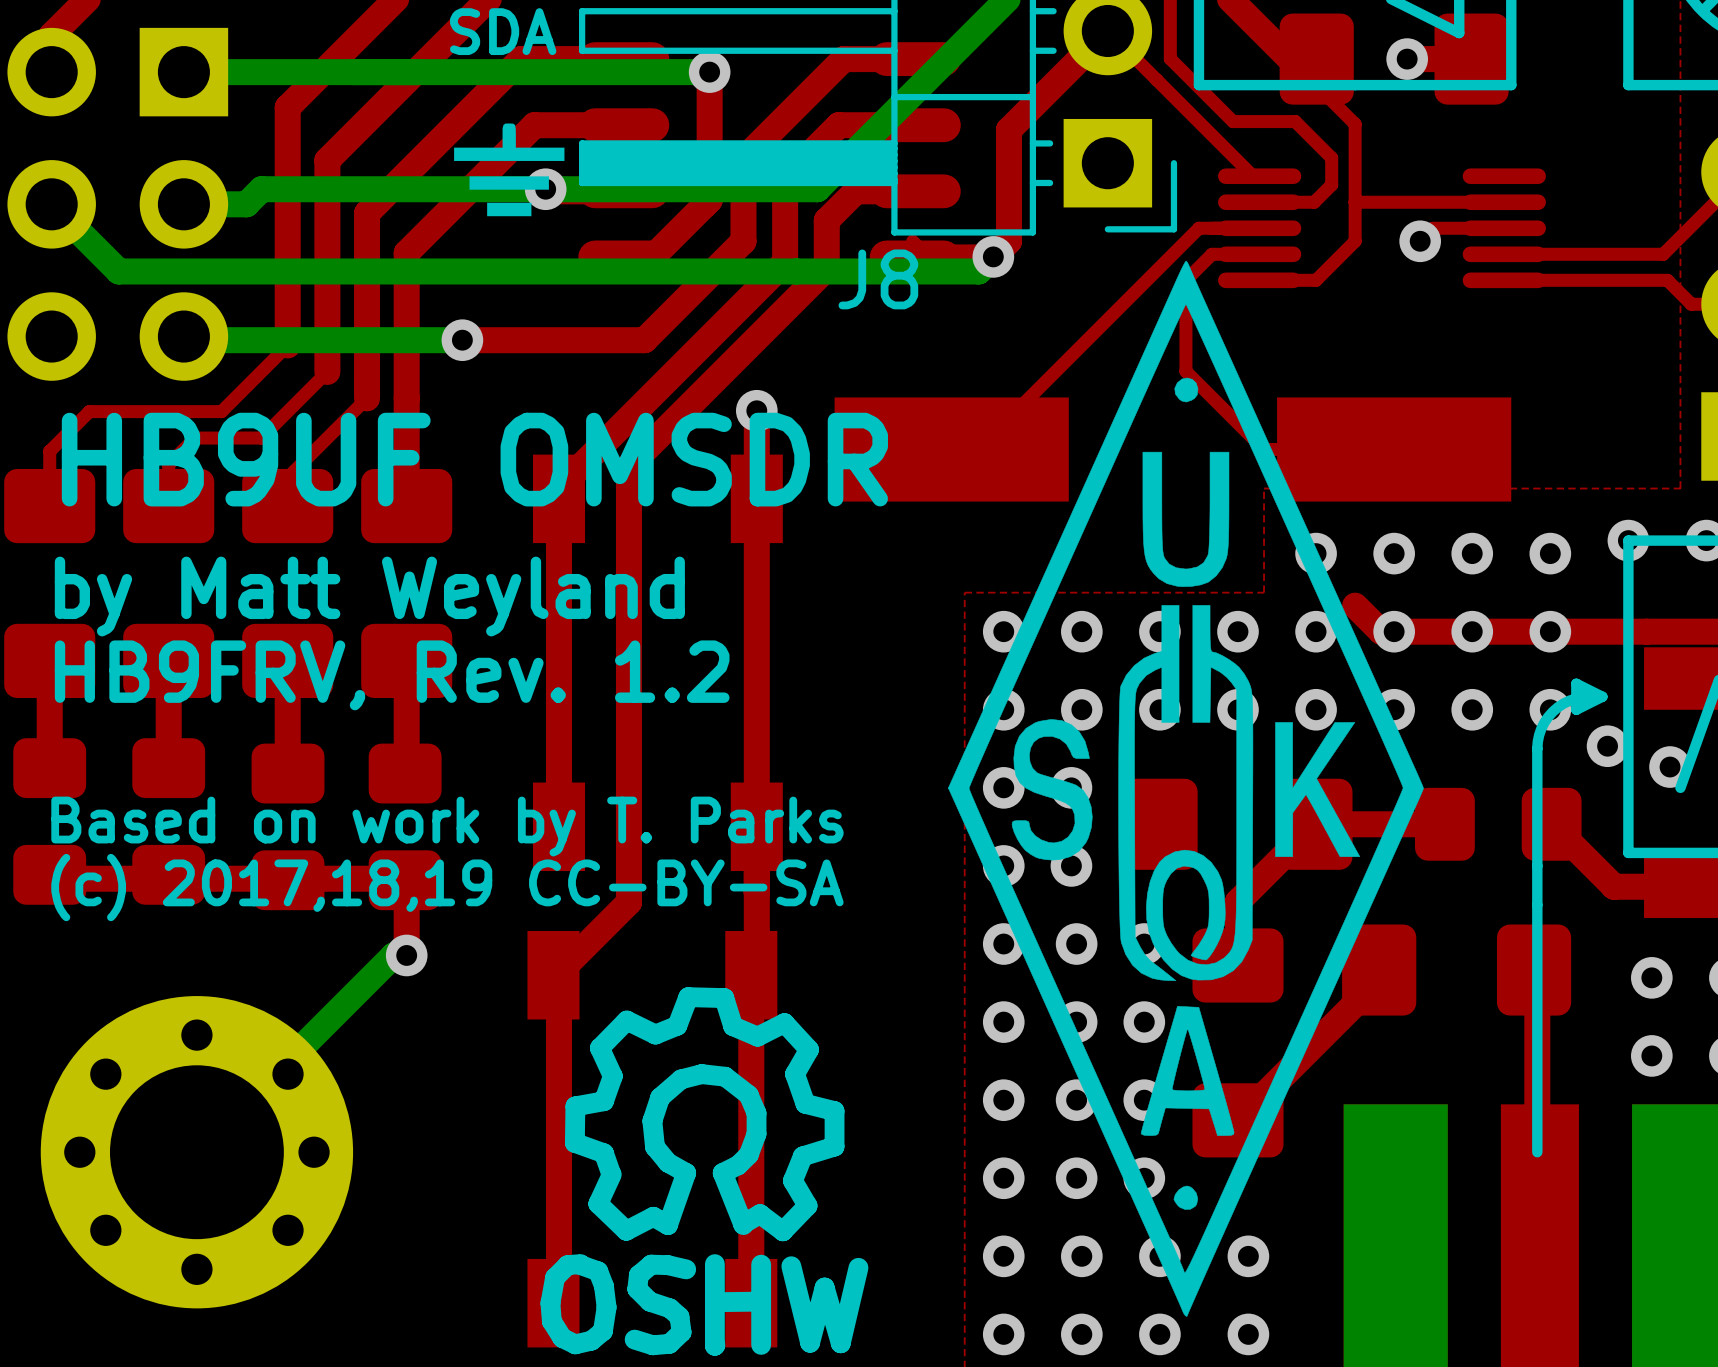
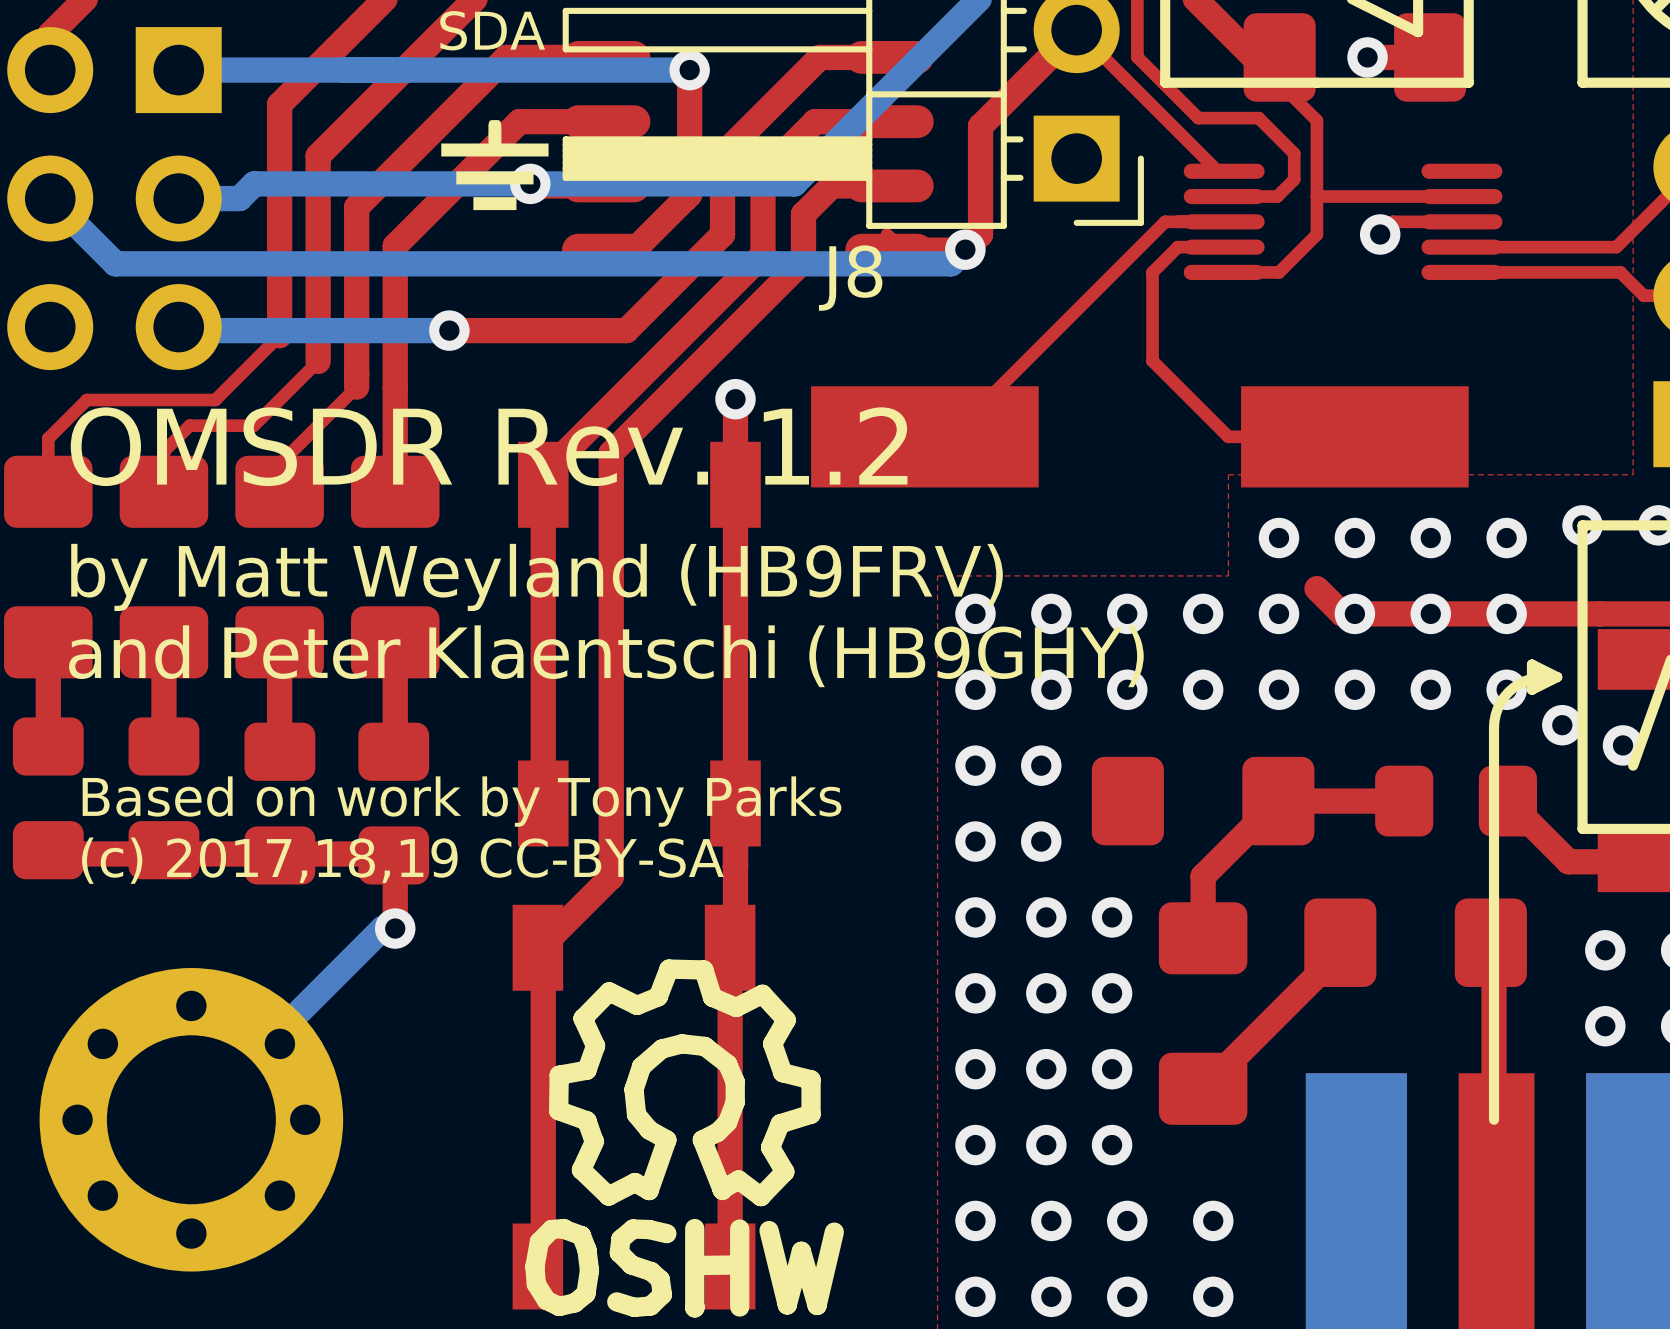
drawing: [948, 260, 1424, 1317] -> none
text: HB9UF OMSDR (474, 459) -> OMSDR Rev. 1.2 (489, 446)
text: by Matt Weyland (369, 596) -> by Matt Weyland (HB9FRV) (537, 577)
text: HB9FRV, Rev. 1.2 (392, 675) -> and Peter Klaentschi (HB9GHY) (606, 656)
text: Based on work by T. Parks (447, 826) -> Based on work by Tony Parks (462, 801)
text position: (c) 2017,18,19 CC-BY-SA (447, 887) -> (c) 2017,18,19 CC-BY-SA (402, 860)

